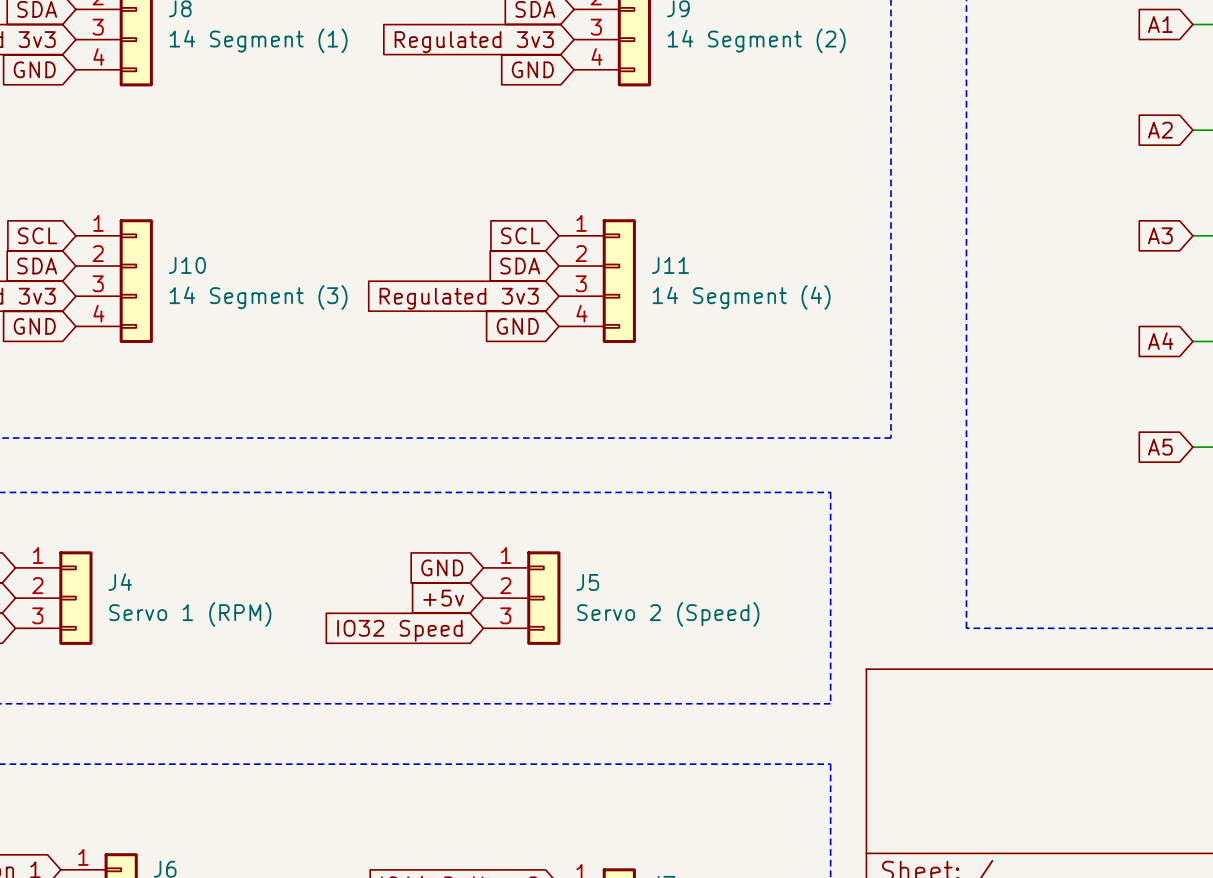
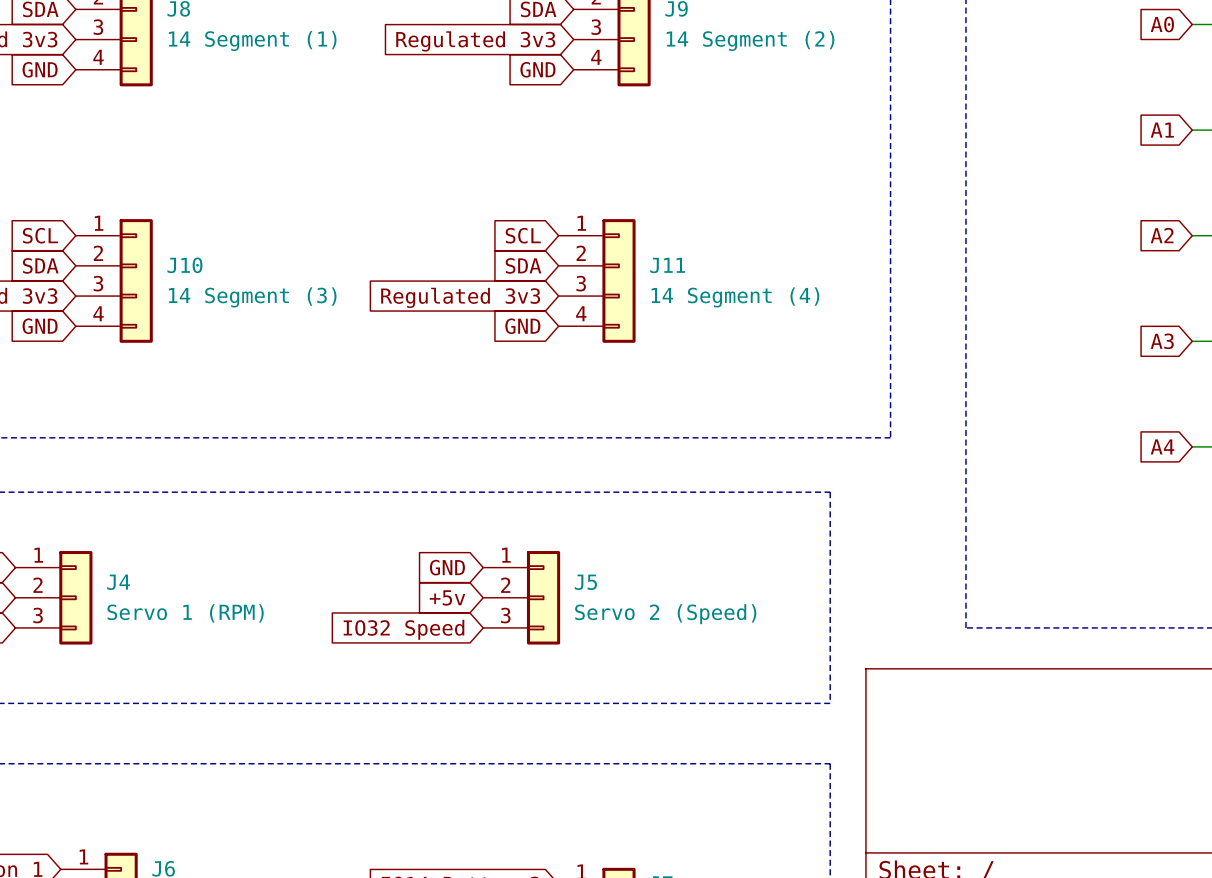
global label: A1 (1160, 24) -> A0 (1162, 24)
global label: A2 (1160, 130) -> A1 (1162, 130)
global label: A3 (1160, 235) -> A2 (1162, 235)
global label: A4 (1160, 341) -> A3 (1162, 341)
global label: A5 (1160, 447) -> A4 (1162, 446)

